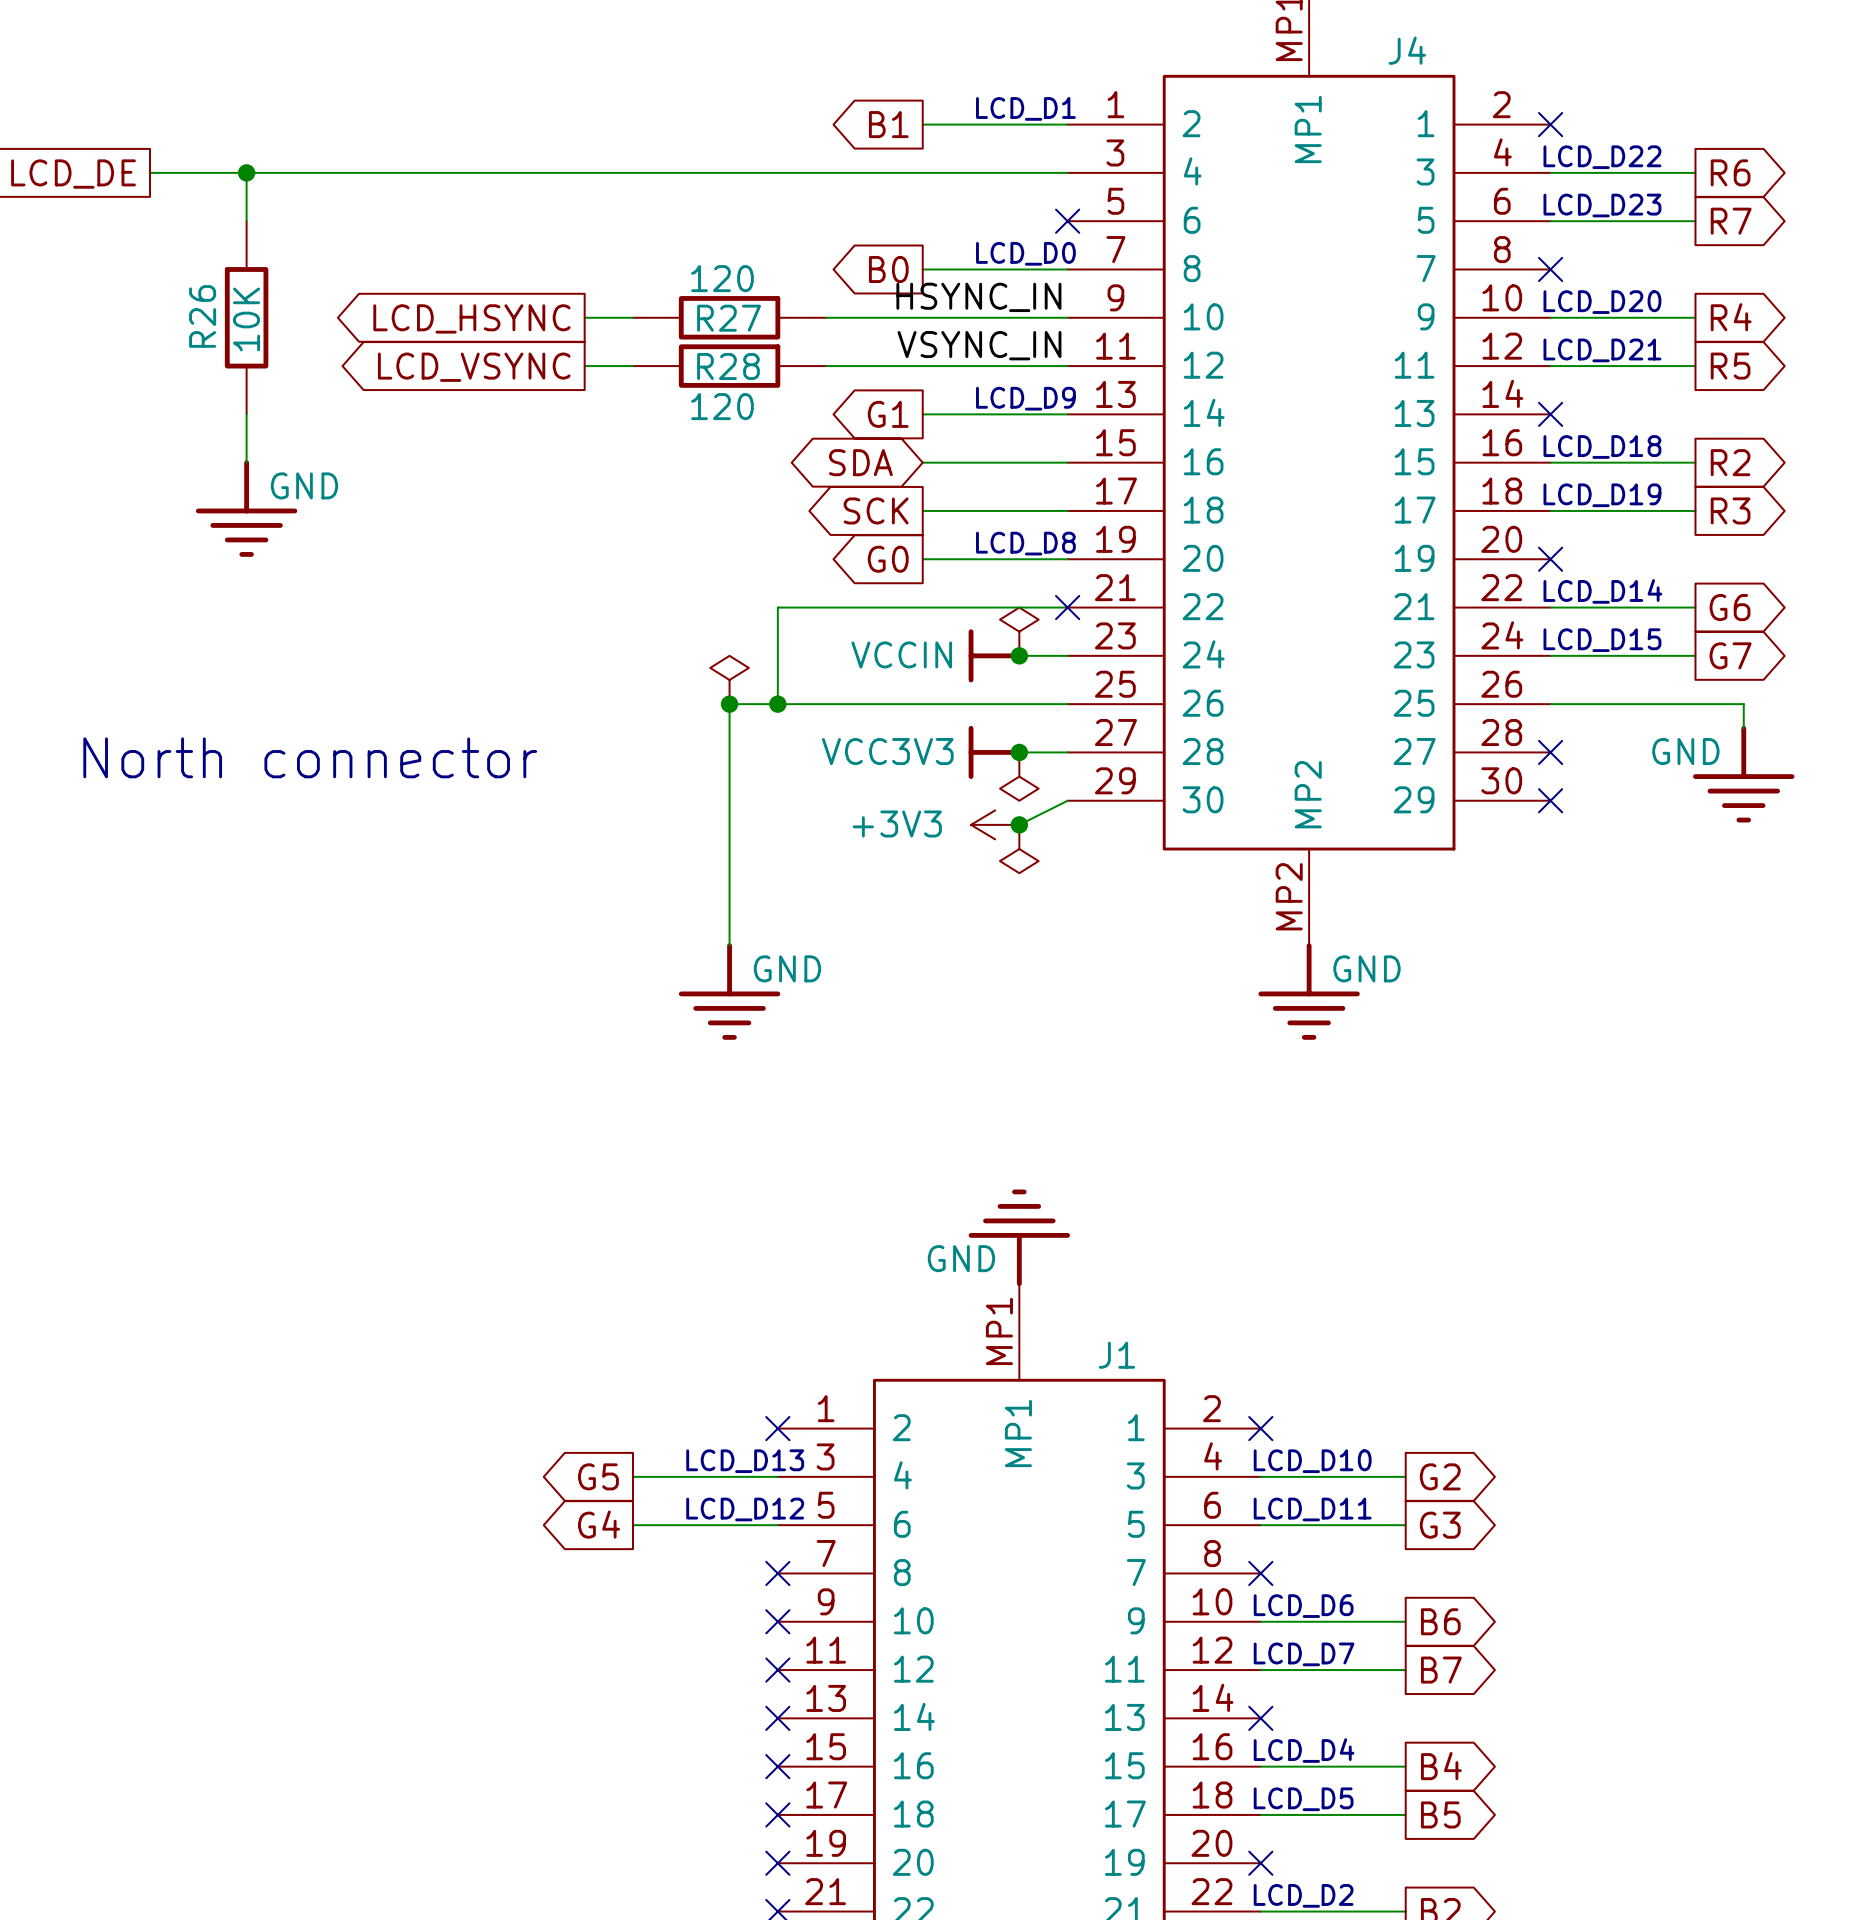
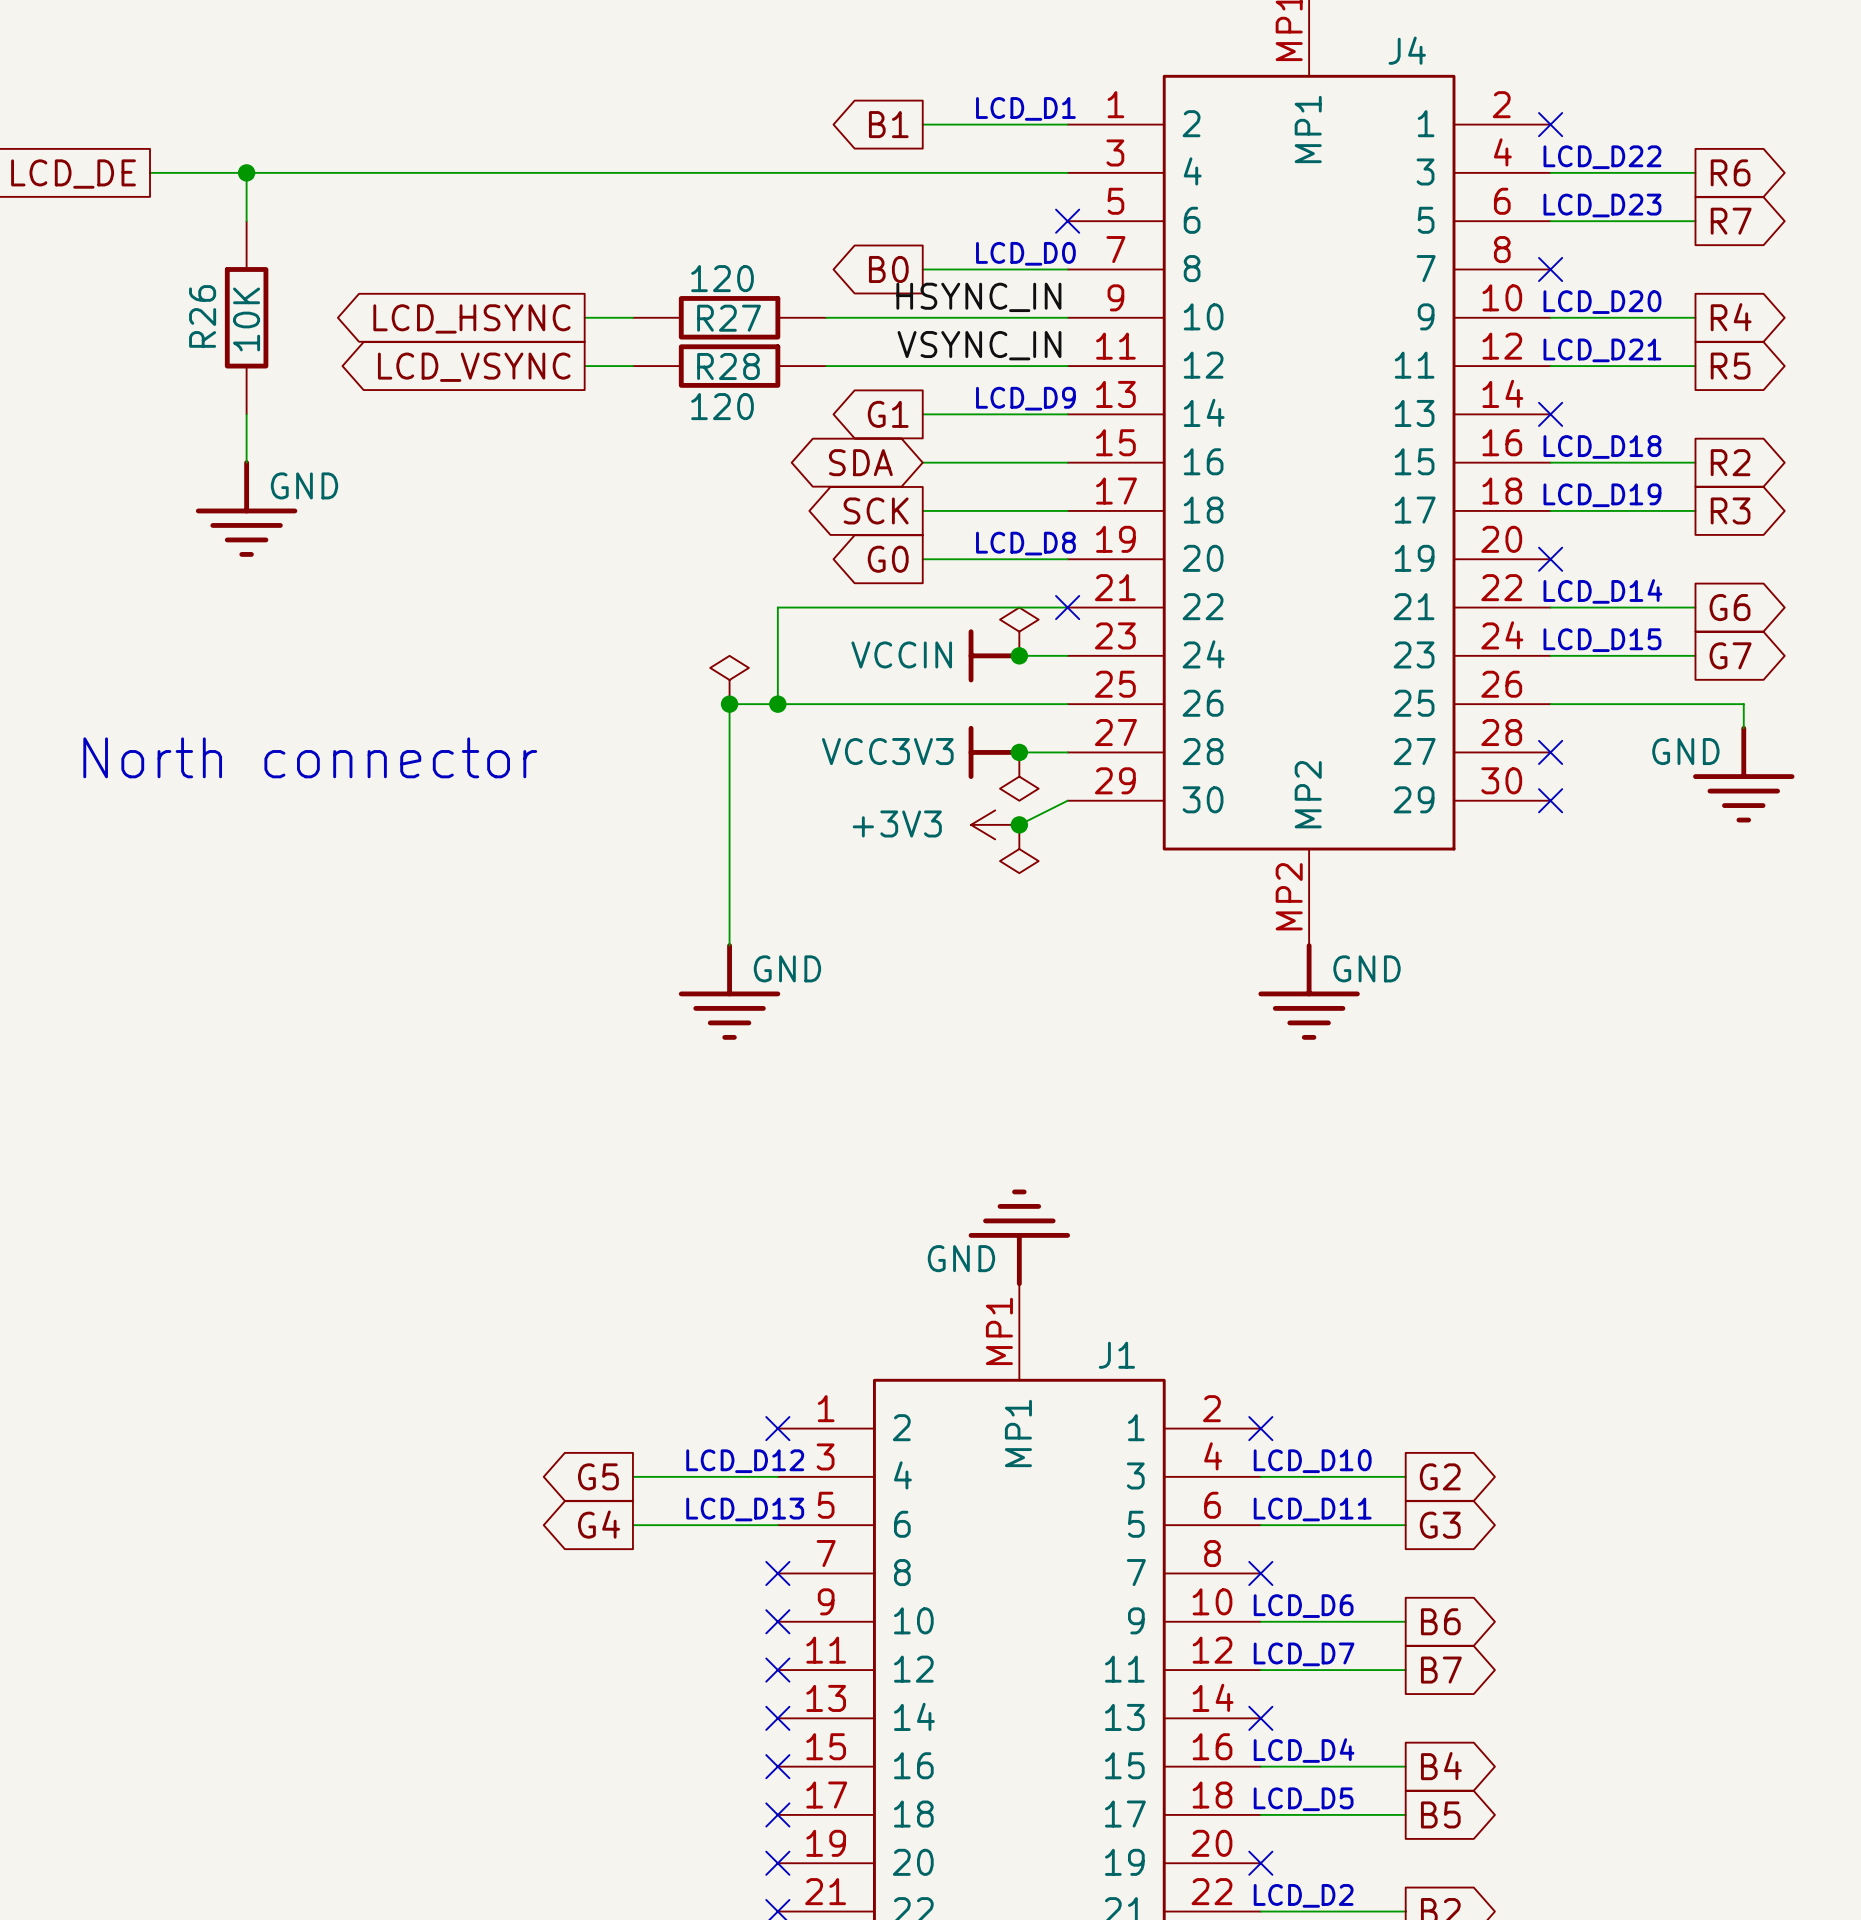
text: LCD_D13 (745, 1461) -> LCD_D12 (745, 1461)
text: LCD_D12 (745, 1509) -> LCD_D13 (745, 1509)

